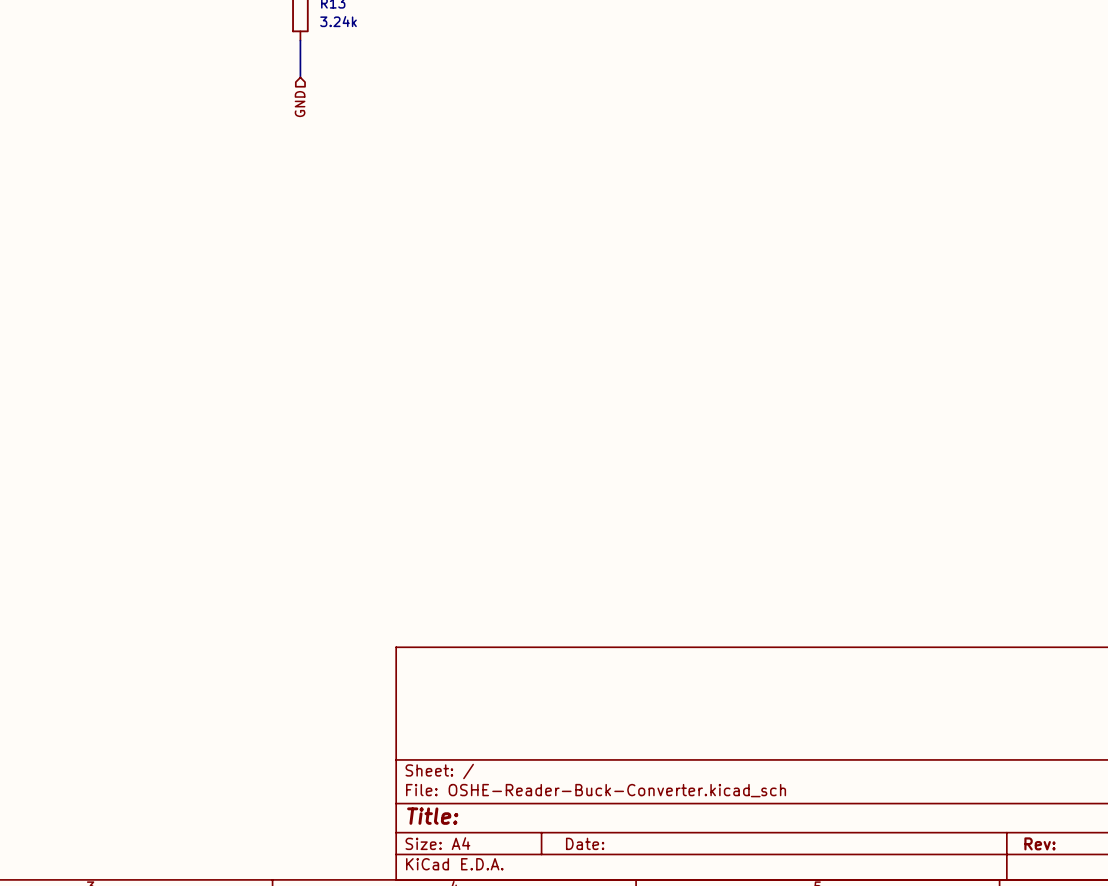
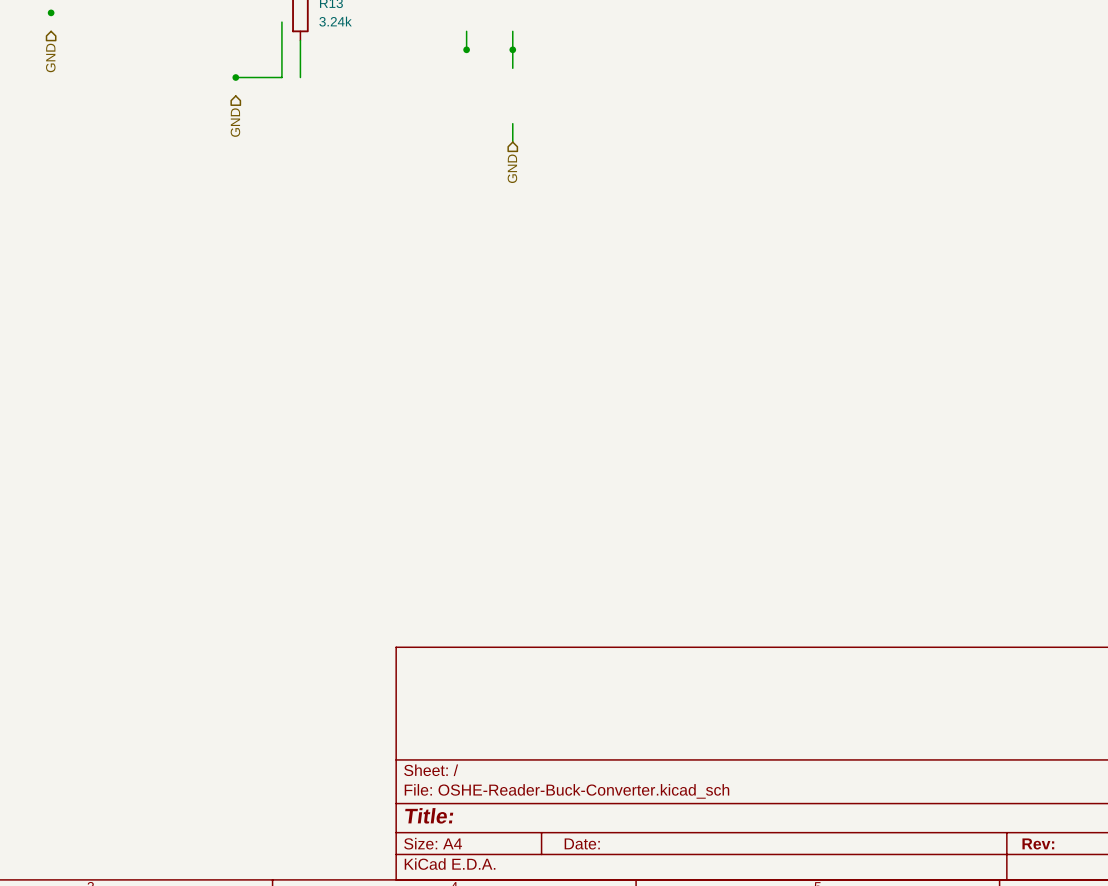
junction: none -> (51, 12)
wire: none -> (281, 22) (281, 77) (235, 77)
wire: none -> (466, 31) (466, 49)
wire: none -> (512, 31) (512, 68)
junction: none -> (466, 49)
junction: none -> (512, 49)
hierarchical label: none -> GND (50, 57)
junction: none -> (235, 77)
hierarchical label position: GND (300, 104) -> GND (235, 122)
wire: none -> (512, 123) (512, 142)
hierarchical label: none -> GND (512, 168)

